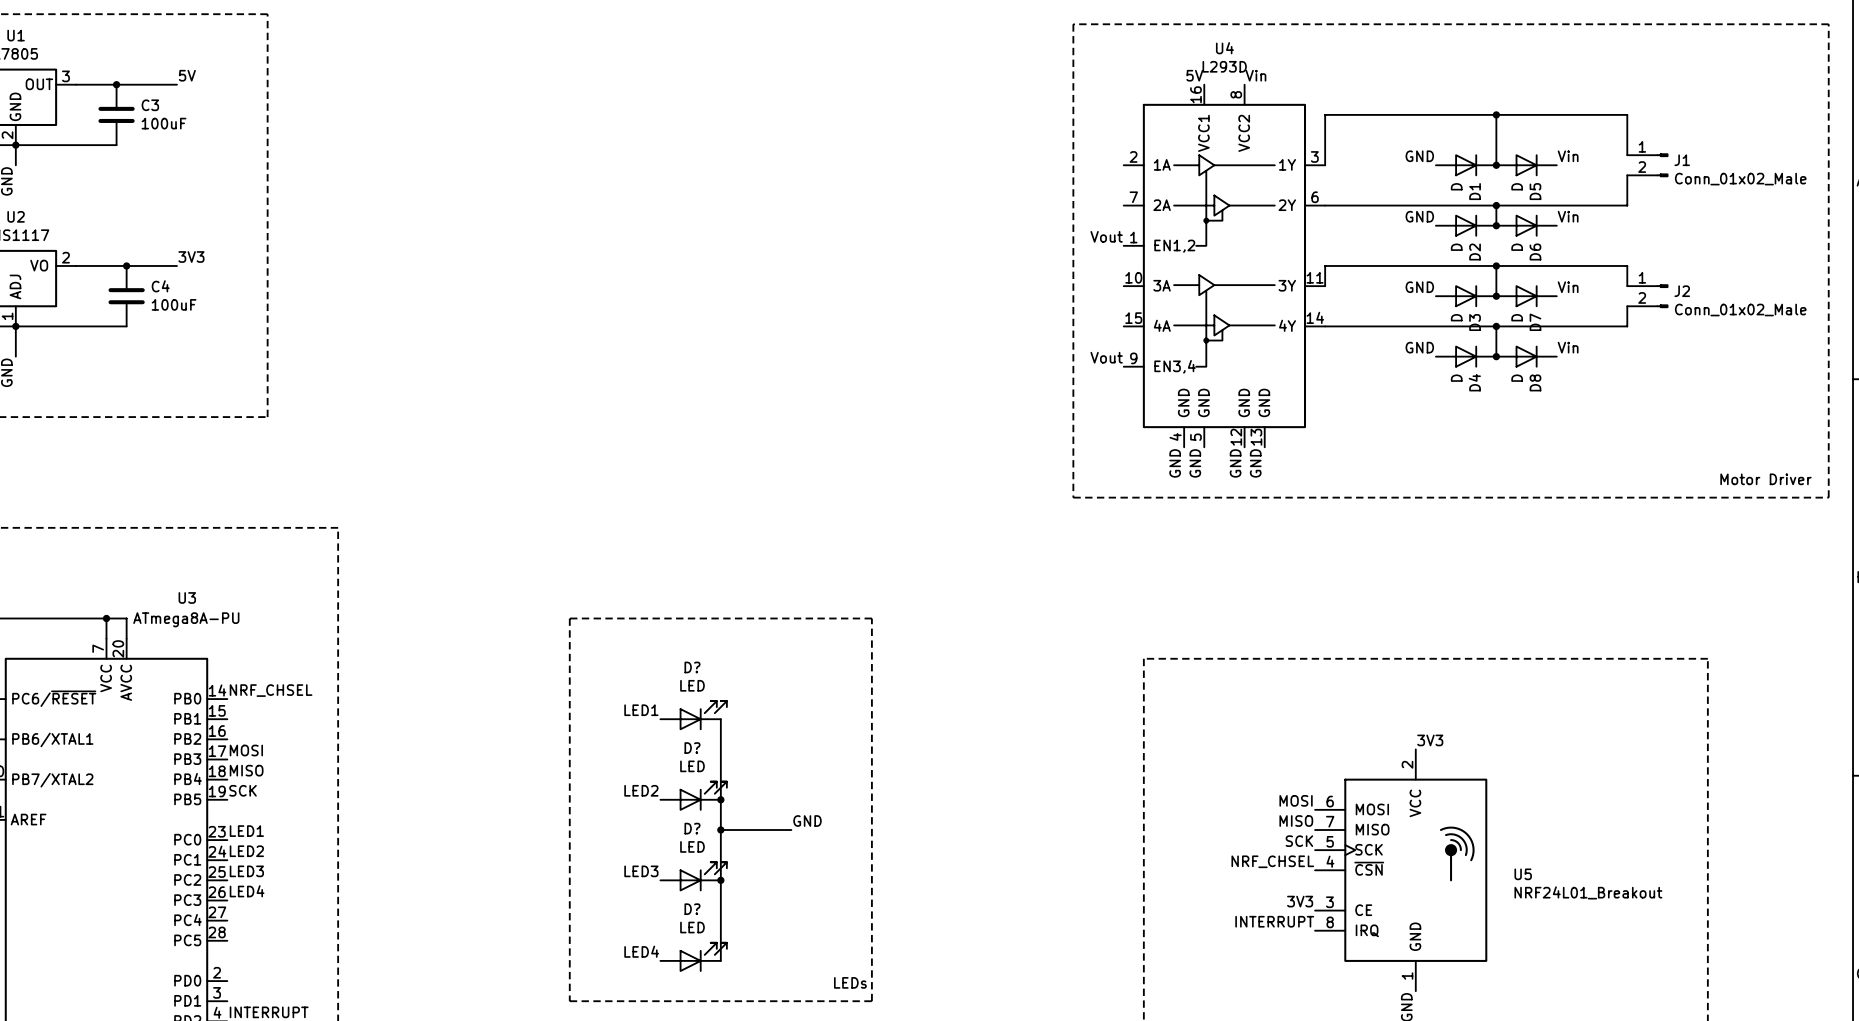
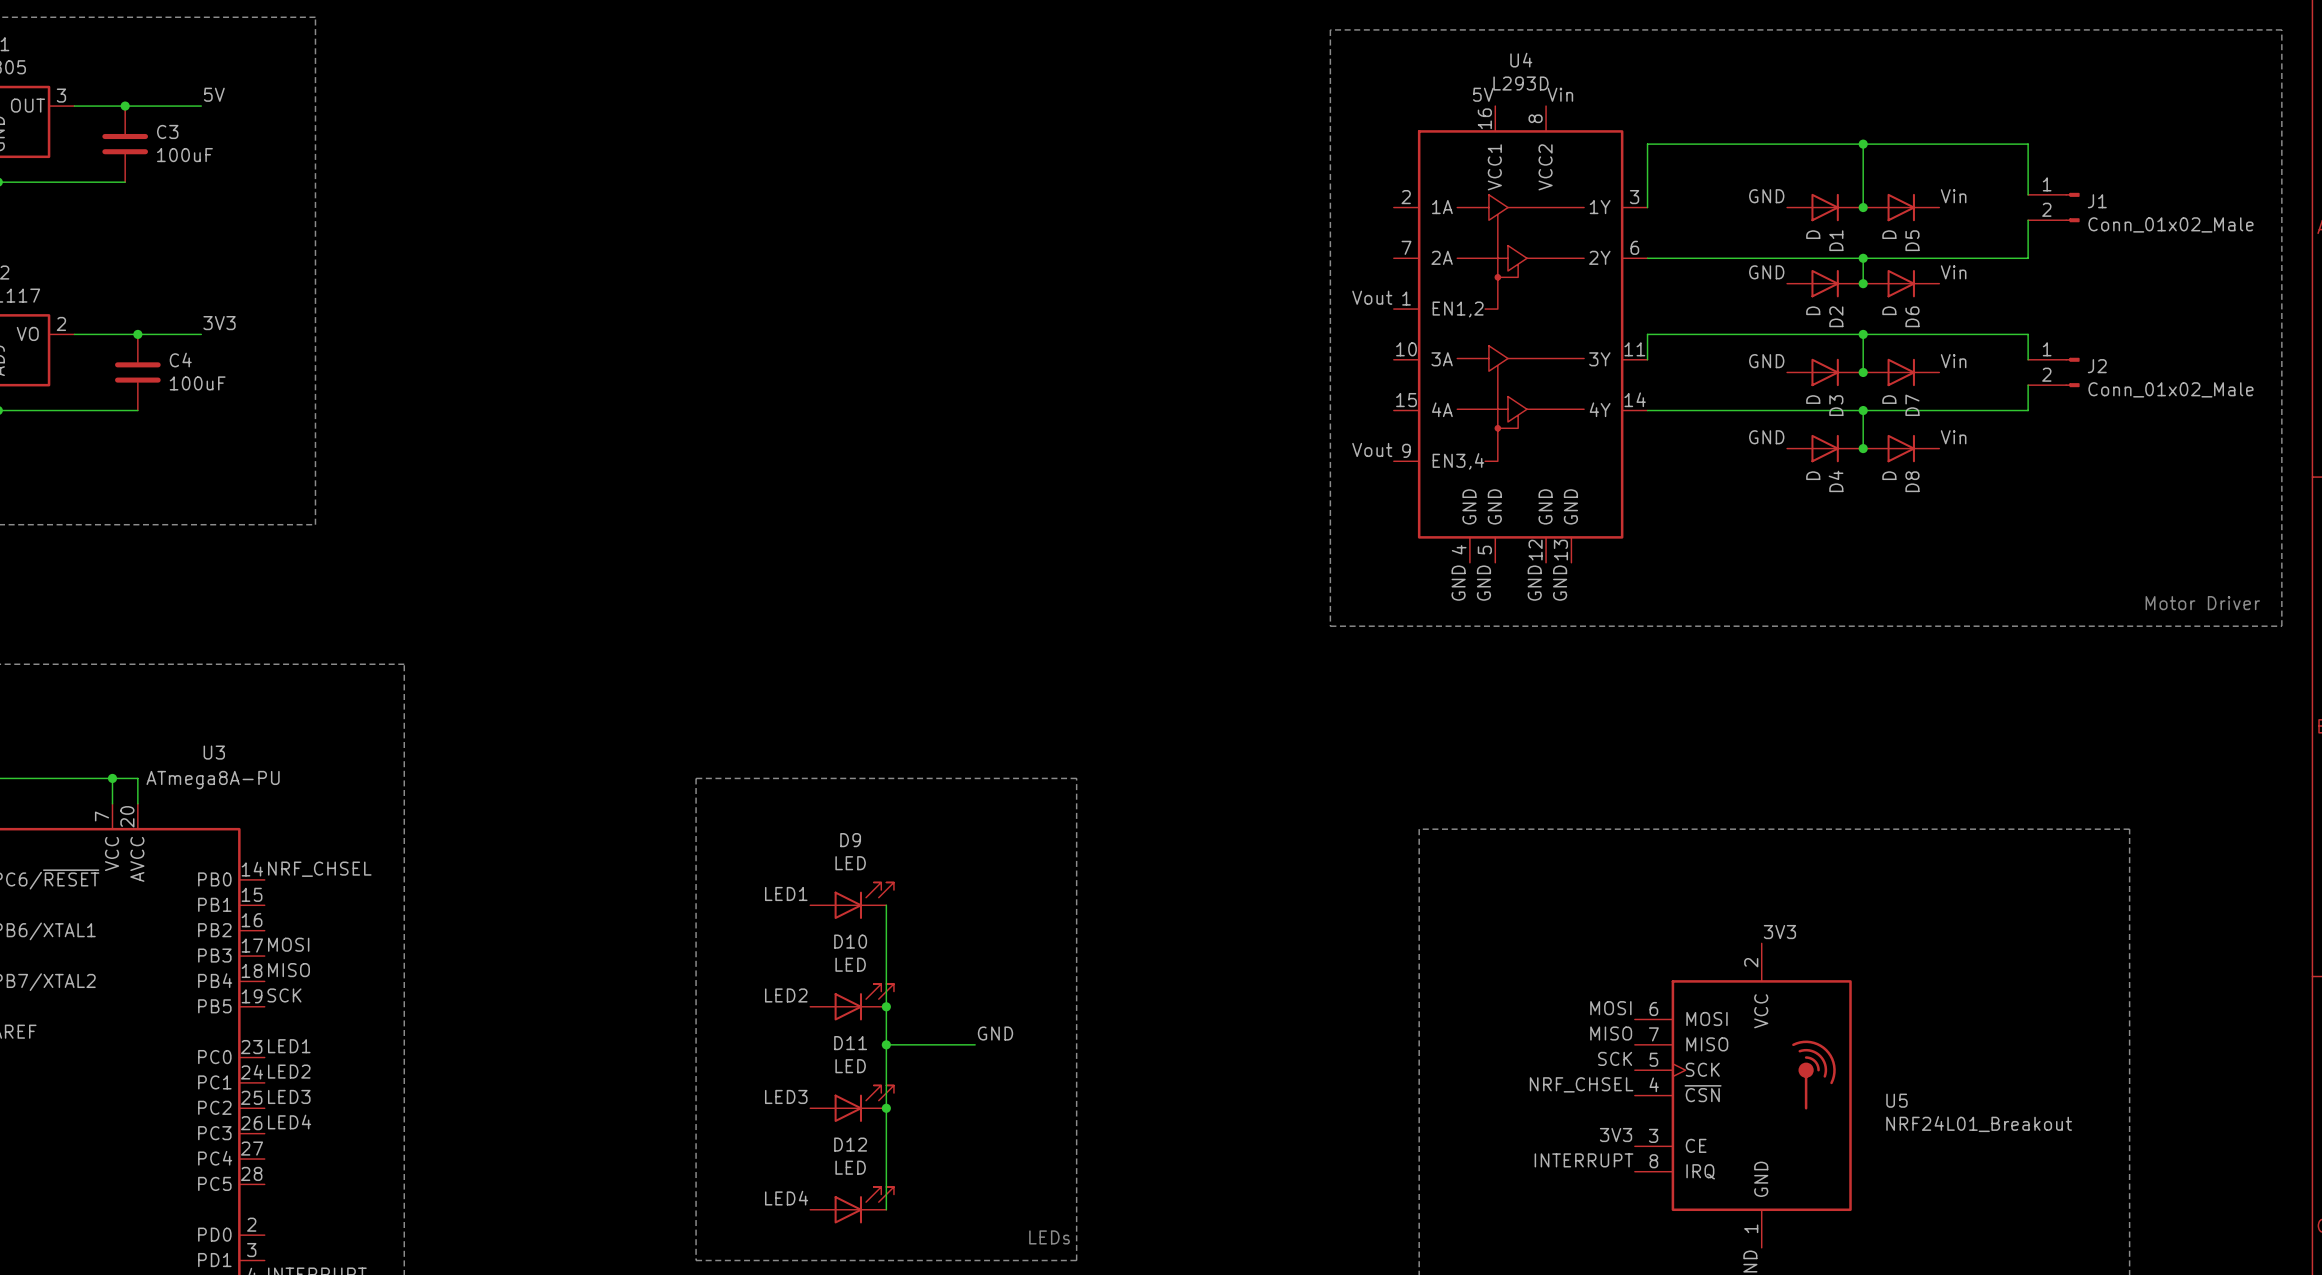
D? name: D? (692, 667) -> D9 (850, 840)
D? name: D? (692, 748) -> D10 (850, 941)
D? name: D? (692, 828) -> D11 (850, 1043)
D? name: D? (692, 909) -> D12 (850, 1144)

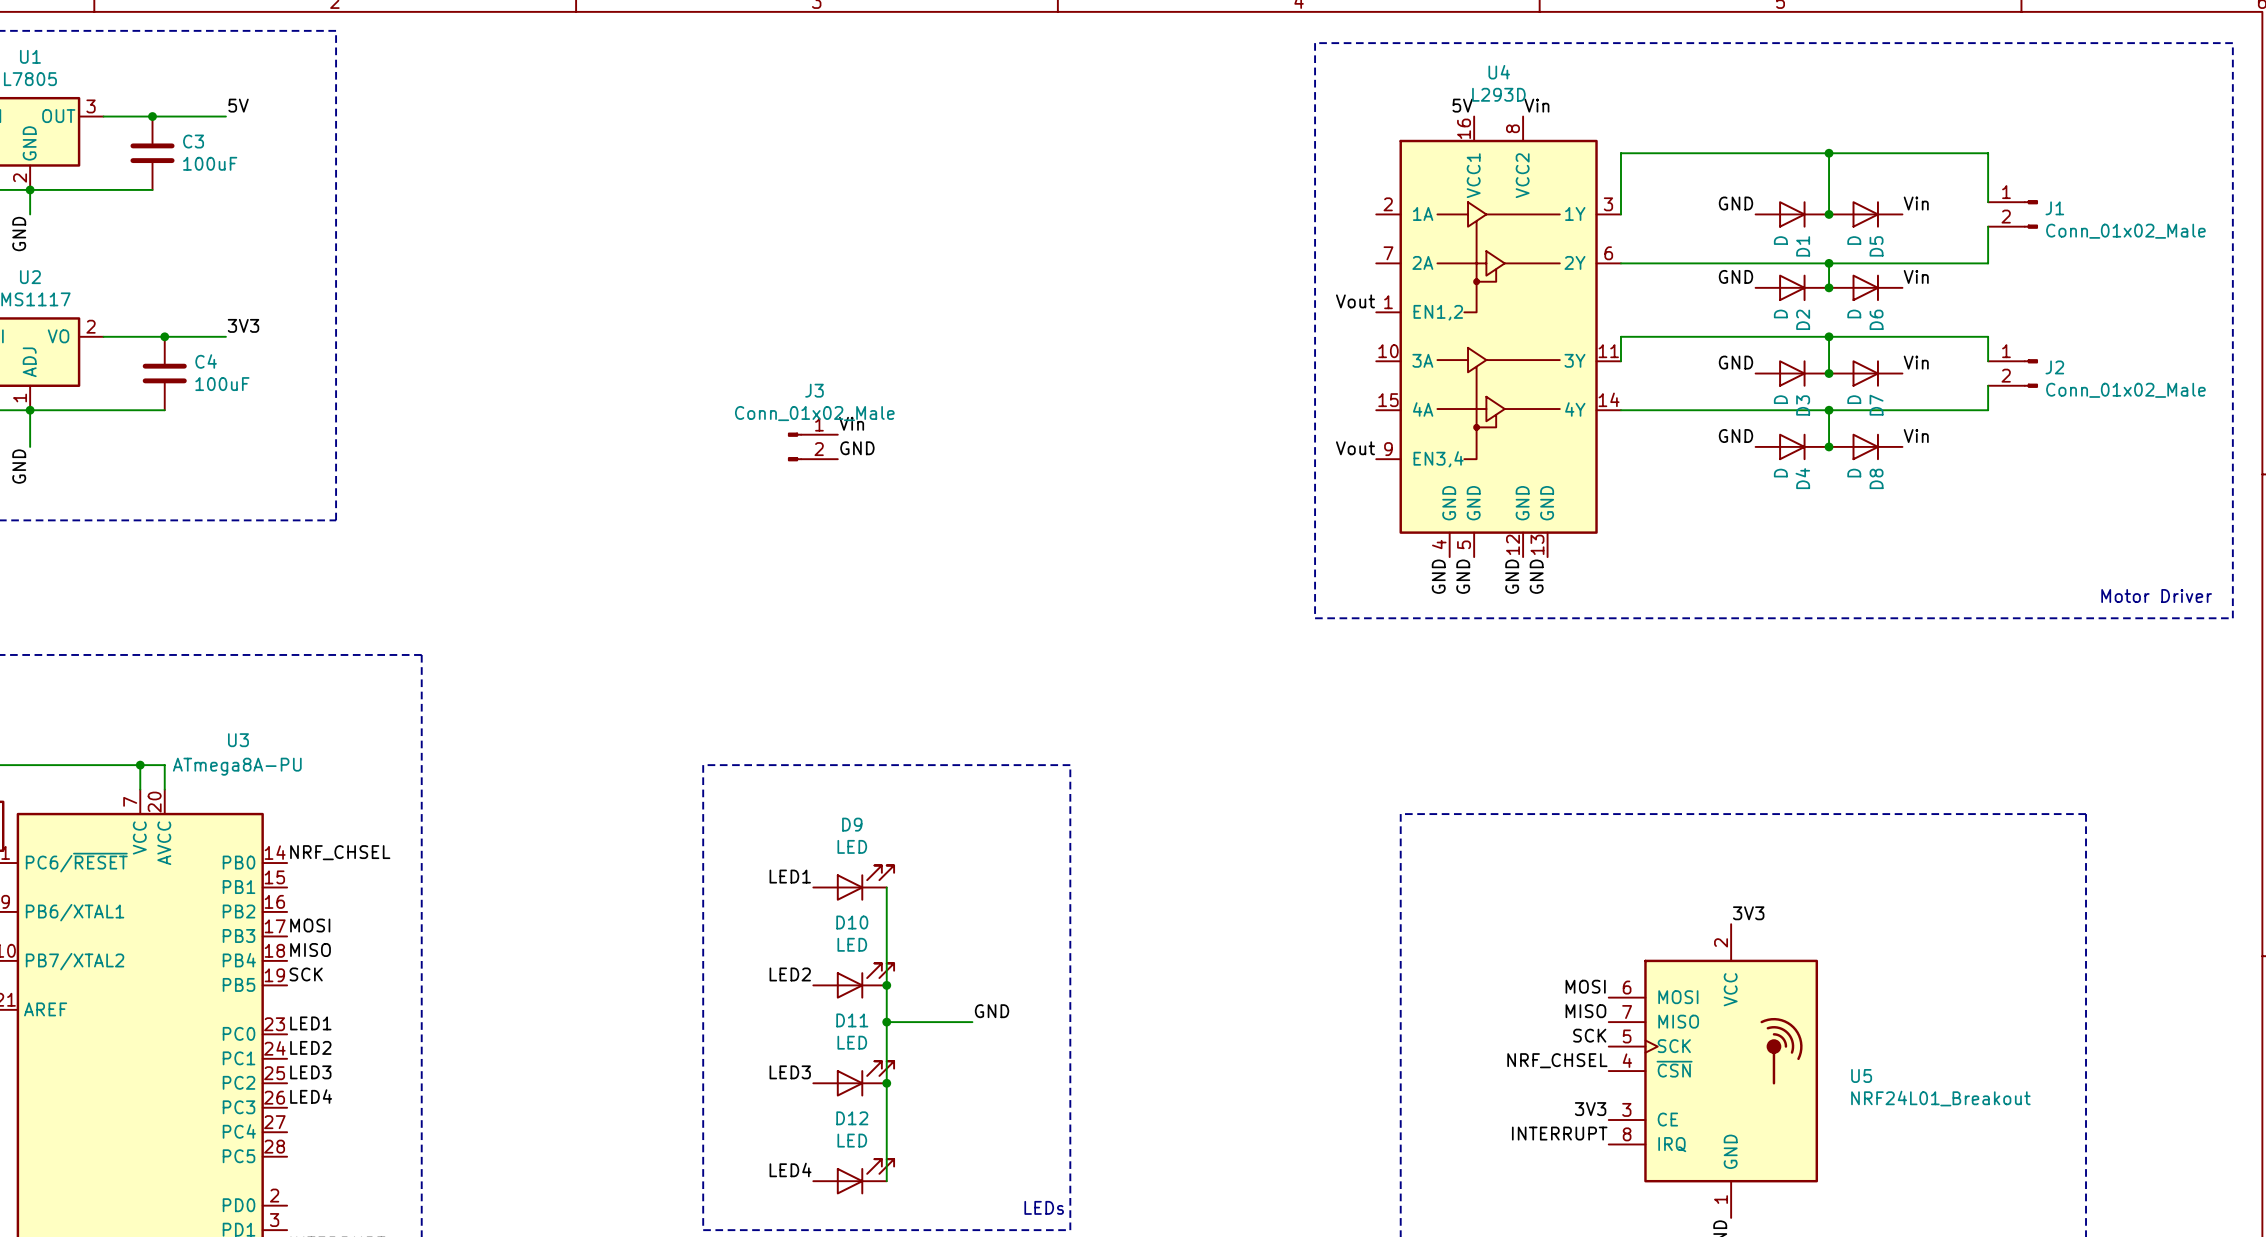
label: none -> Vin (851, 423)
J3: none -> Conn_01x02_Male (812, 446)
label: none -> GND (857, 448)

